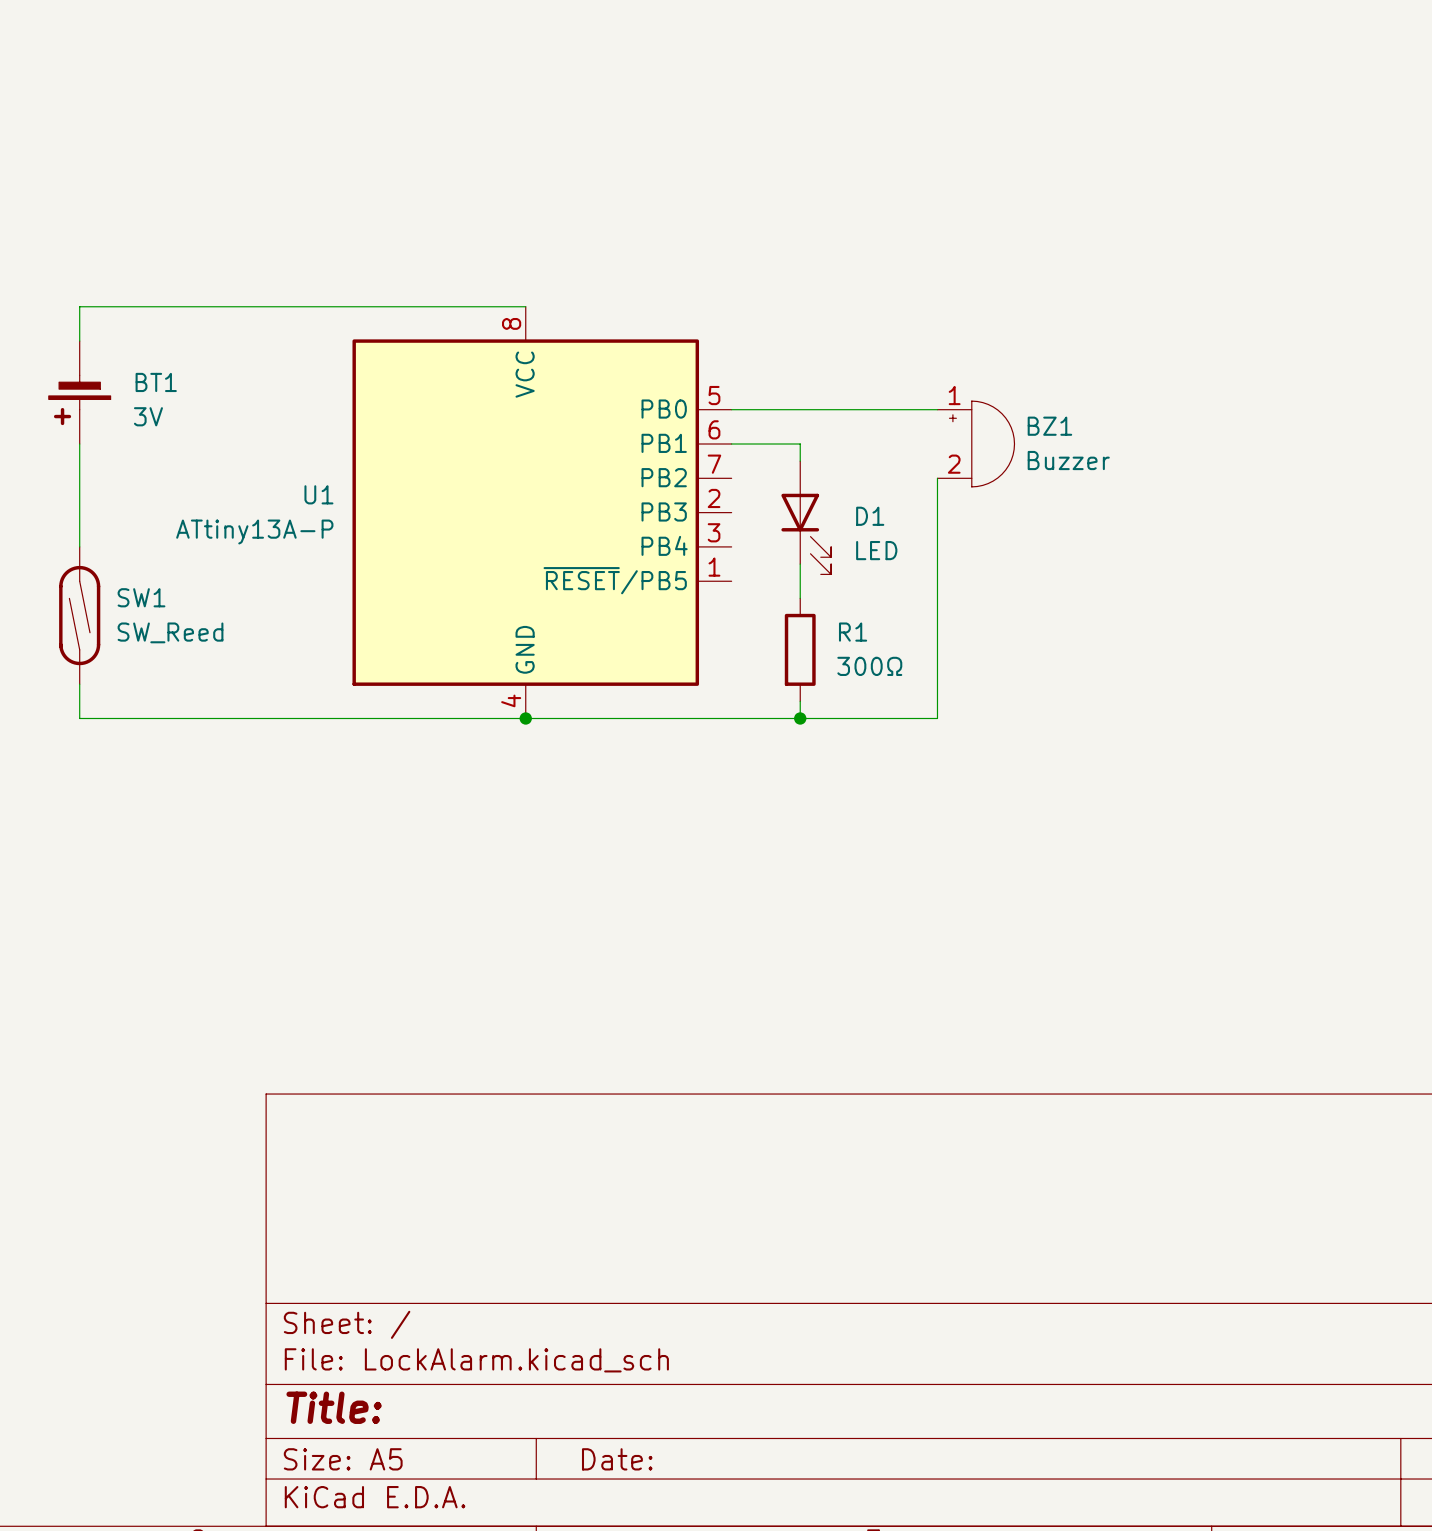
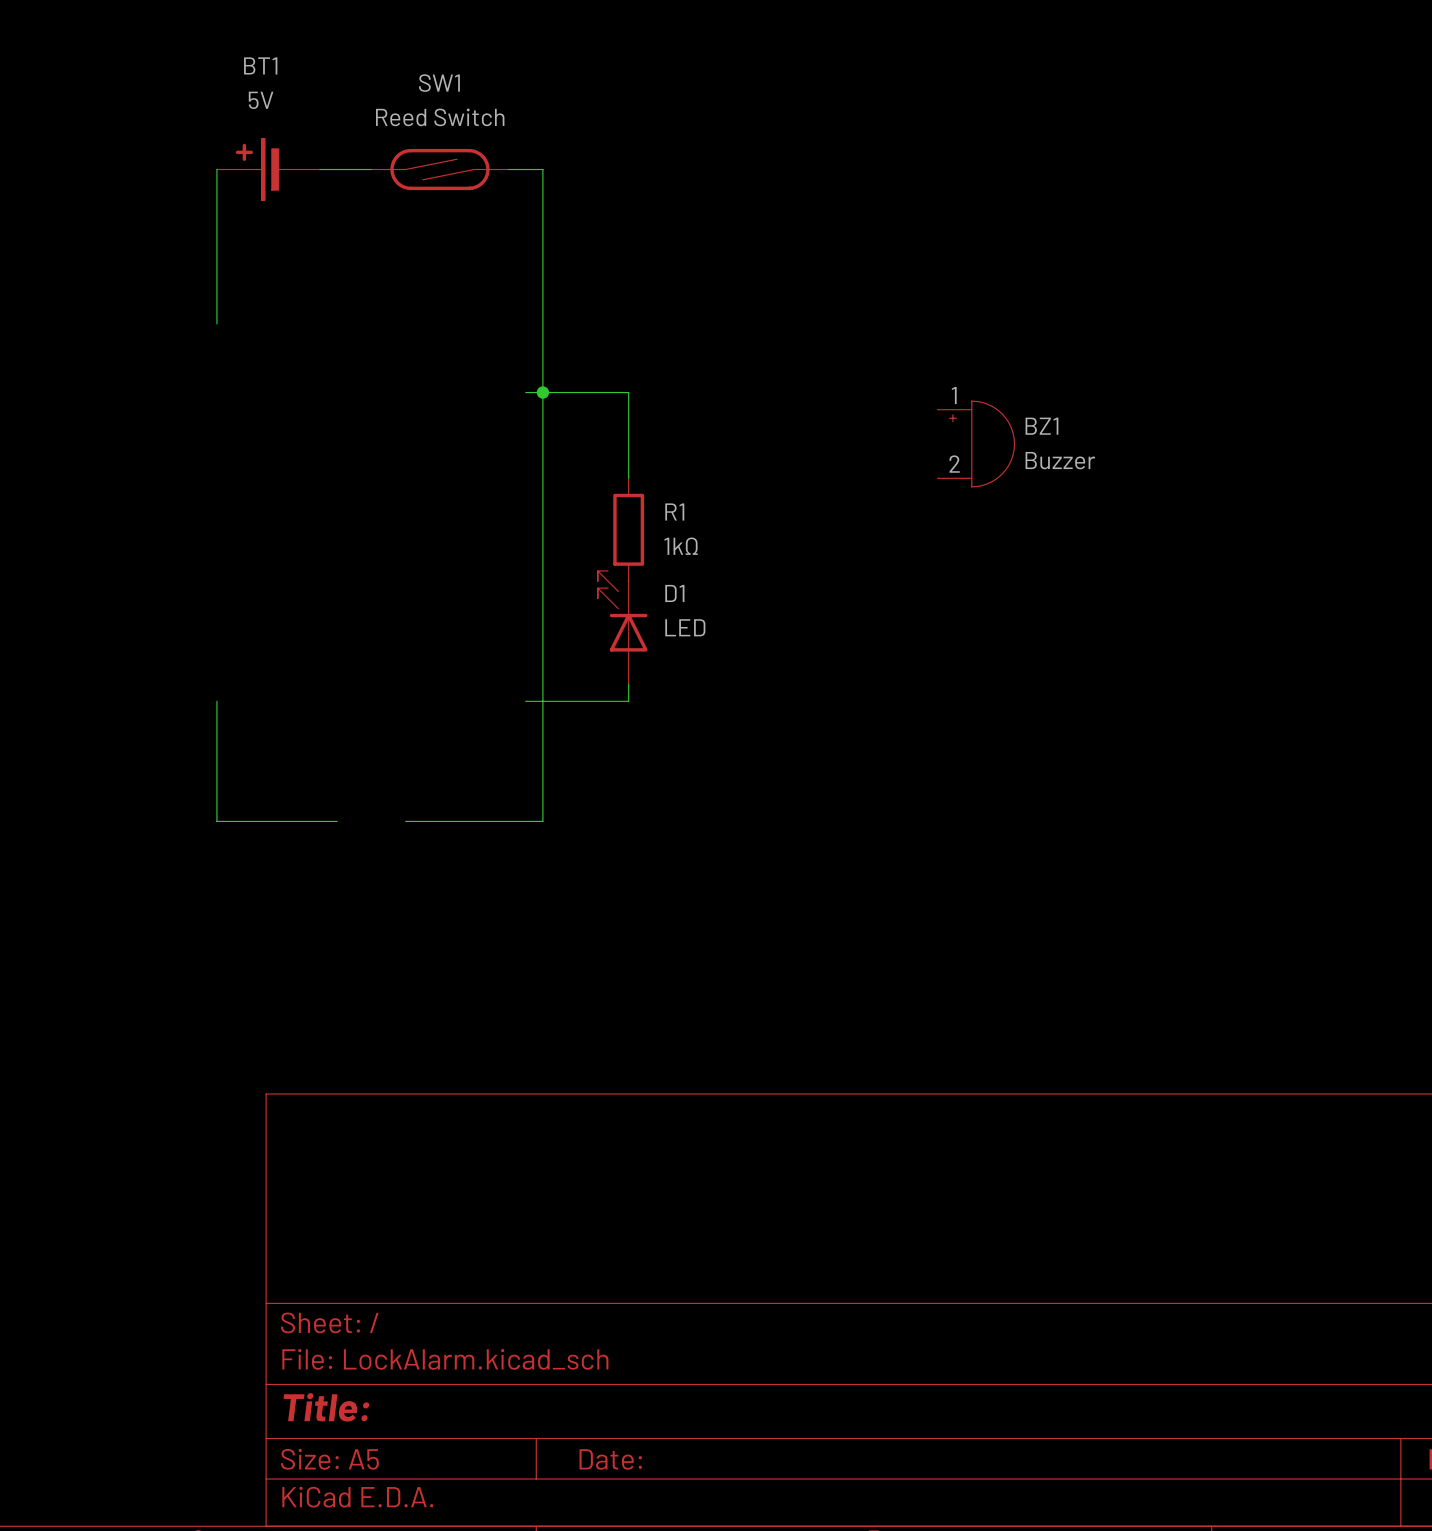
wire: none -> (216, 169) (216, 323)
wire: none -> (319, 169) (371, 169)
wire: none -> (508, 169) (542, 169) (542, 821) (405, 821)
wire: (525, 306) (79, 306) (79, 341) -> none
BT1 name position: BT1 (156, 382) -> BT1 (260, 65)
BT1 position: (79, 392) -> (268, 169)
junction: none -> (542, 392)
BT1 rotation: 0° (79, 400) -> 90° clockwise (260, 169)
wire: (731, 409) (937, 409) -> none
BT1 value: 3V (148, 416) -> 5V (261, 100)
wire: (79, 444) (79, 546) -> none
wire: (731, 444) (800, 444) (800, 461) -> none
wire: (937, 478) (937, 718) (79, 718) (79, 684) -> none
U1: ATtiny13A-P (542, 512) -> none
D1 name position: D1 (870, 516) -> D1 (674, 593)
D1 position: (806, 517) -> (622, 627)
D1 rotation: 0° (806, 534) -> 180° (622, 611)
D1 value position: LED (876, 550) -> LED (685, 627)
wire: (800, 564) (800, 598) -> none
SW1 rotation: 0° (79, 615) -> 90° counterclockwise (439, 169)
SW1 position: (79, 615) -> (439, 169)
SW1 value: SW_Reed (170, 632) -> Reed Switch (440, 117)
R1 position: (800, 649) -> (628, 529)
R1 value: 300Ω (869, 666) -> 1kΩ (681, 546)
wire: none -> (628, 684) (628, 701) (525, 701)
wire: none -> (216, 701) (216, 821) (337, 821)
wire: (800, 701) (800, 718) -> none
junction: (525, 718) -> none
junction: (800, 718) -> none

